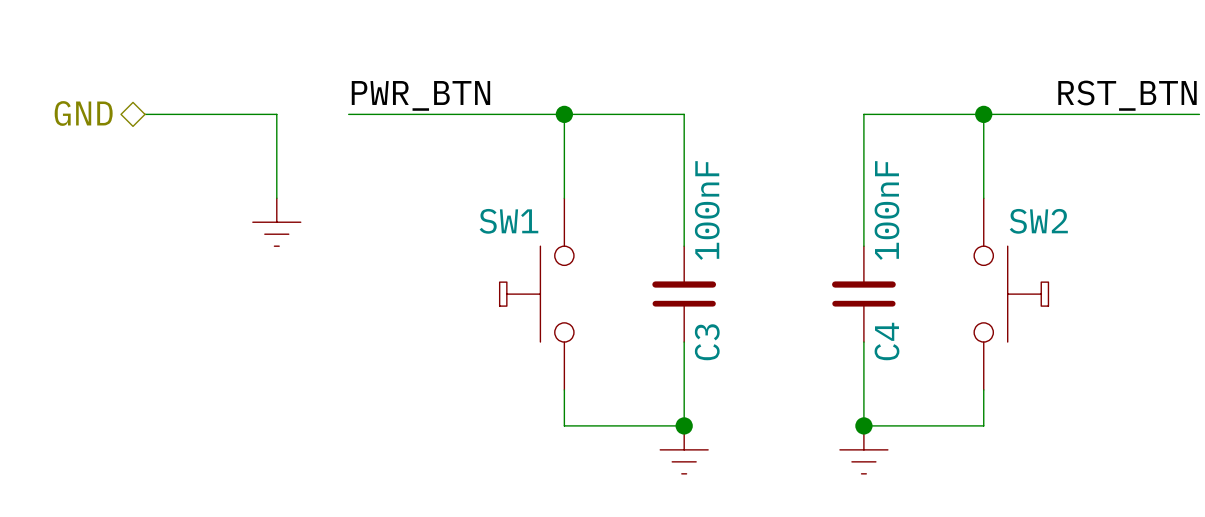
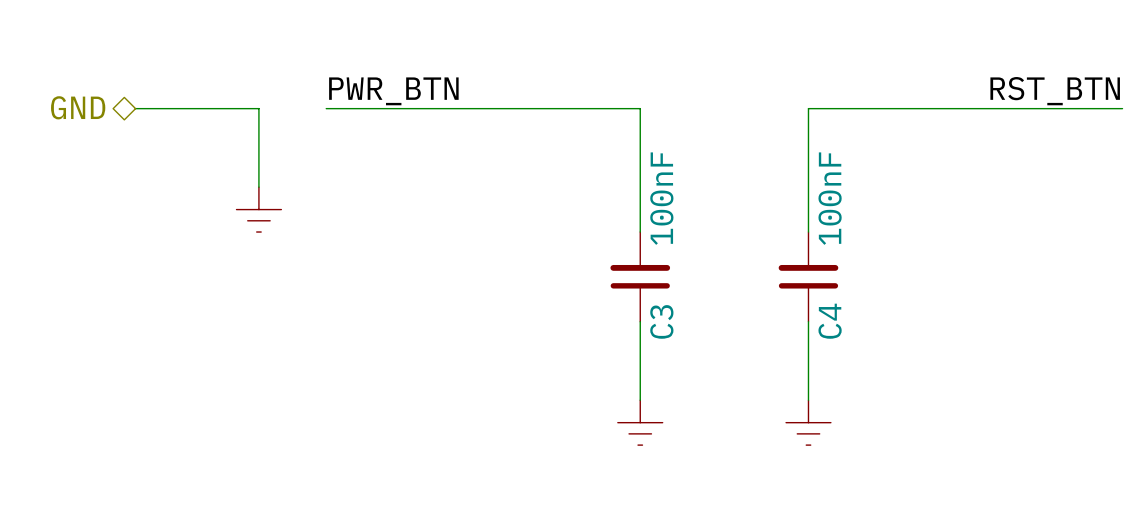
wire: (564, 114) (564, 198) -> none
junction: (564, 114) -> none
wire: (983, 114) (983, 198) -> none
junction: (983, 114) -> none
SW1: (536, 294) -> none
SW2: (1011, 294) -> none
wire: (564, 389) (564, 425) (684, 425) -> none
wire: (983, 389) (983, 425) (863, 425) -> none
junction: (684, 425) -> none
junction: (863, 425) -> none

